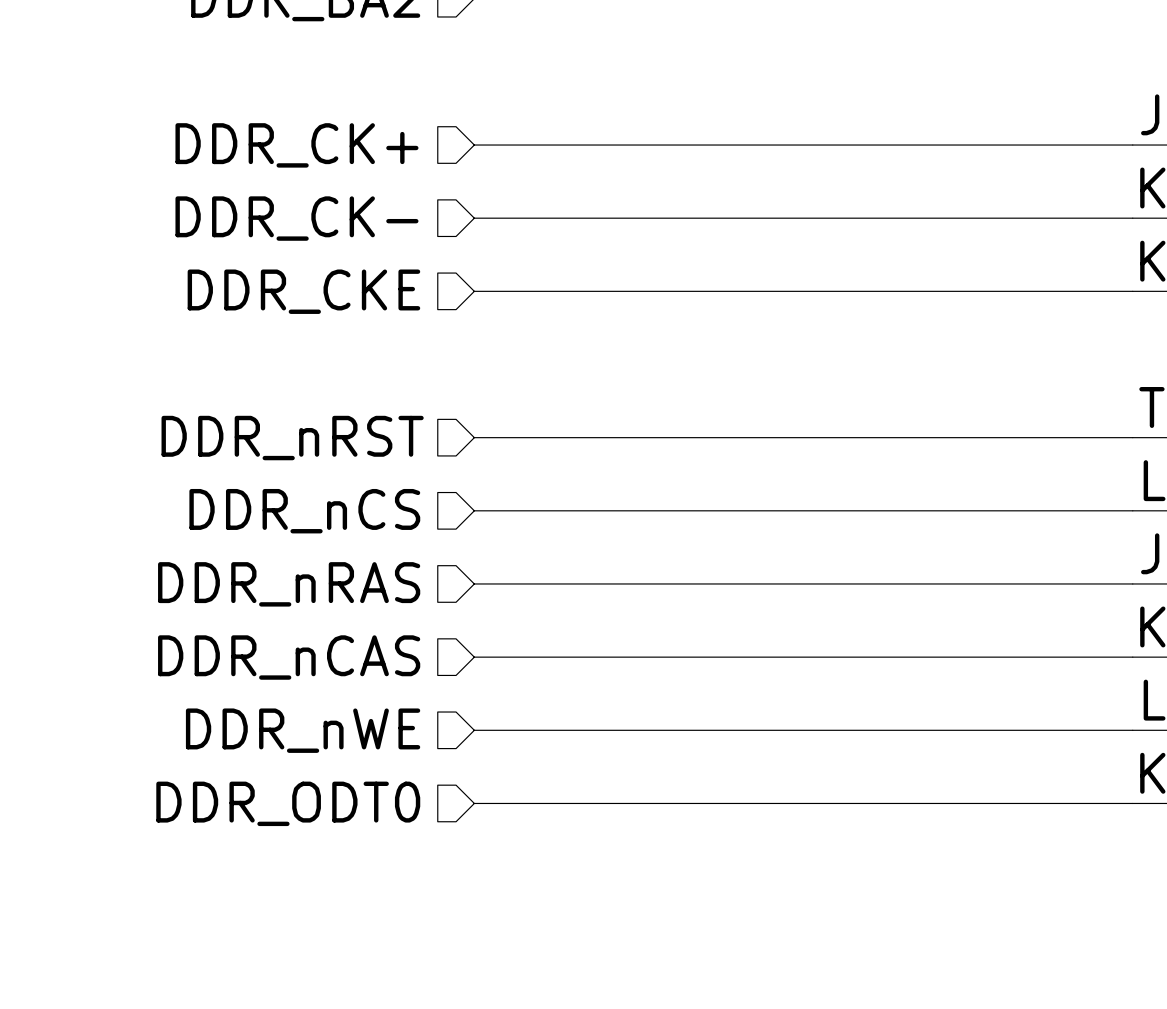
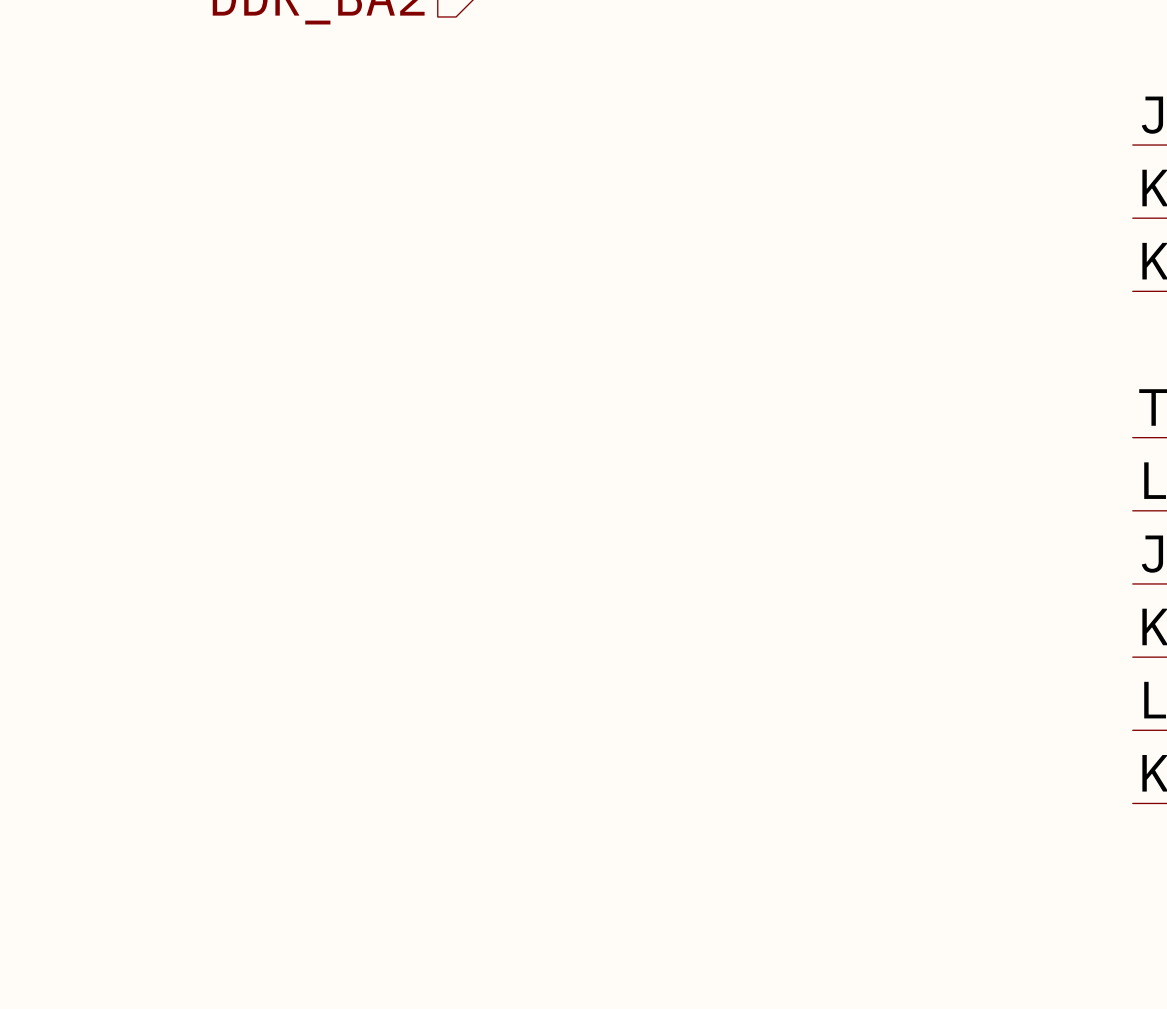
hierarchical label: DDR_CK+ (296, 145) -> none
wire: (474, 145) (1132, 145) -> none
hierarchical label: DDR_CK- (296, 218) -> none
wire: (474, 218) (1132, 218) -> none
hierarchical label: DDR_CKE (303, 291) -> none
wire: (474, 291) (1132, 291) -> none
wire: (474, 437) (1132, 437) -> none
hierarchical label: DDR_nRST (292, 438) -> none
wire: (474, 510) (1132, 510) -> none
hierarchical label: DDR_nCS (304, 511) -> none
wire: (474, 583) (1132, 583) -> none
hierarchical label: DDR_nRAS (289, 584) -> none
hierarchical label: DDR_nCAS (289, 657) -> none
wire: (474, 657) (1132, 657) -> none
hierarchical label: DDR_nWE (303, 730) -> none
wire: (474, 730) (1132, 730) -> none
hierarchical label: DDR_ODT0 (288, 803) -> none
wire: (474, 803) (1132, 803) -> none

